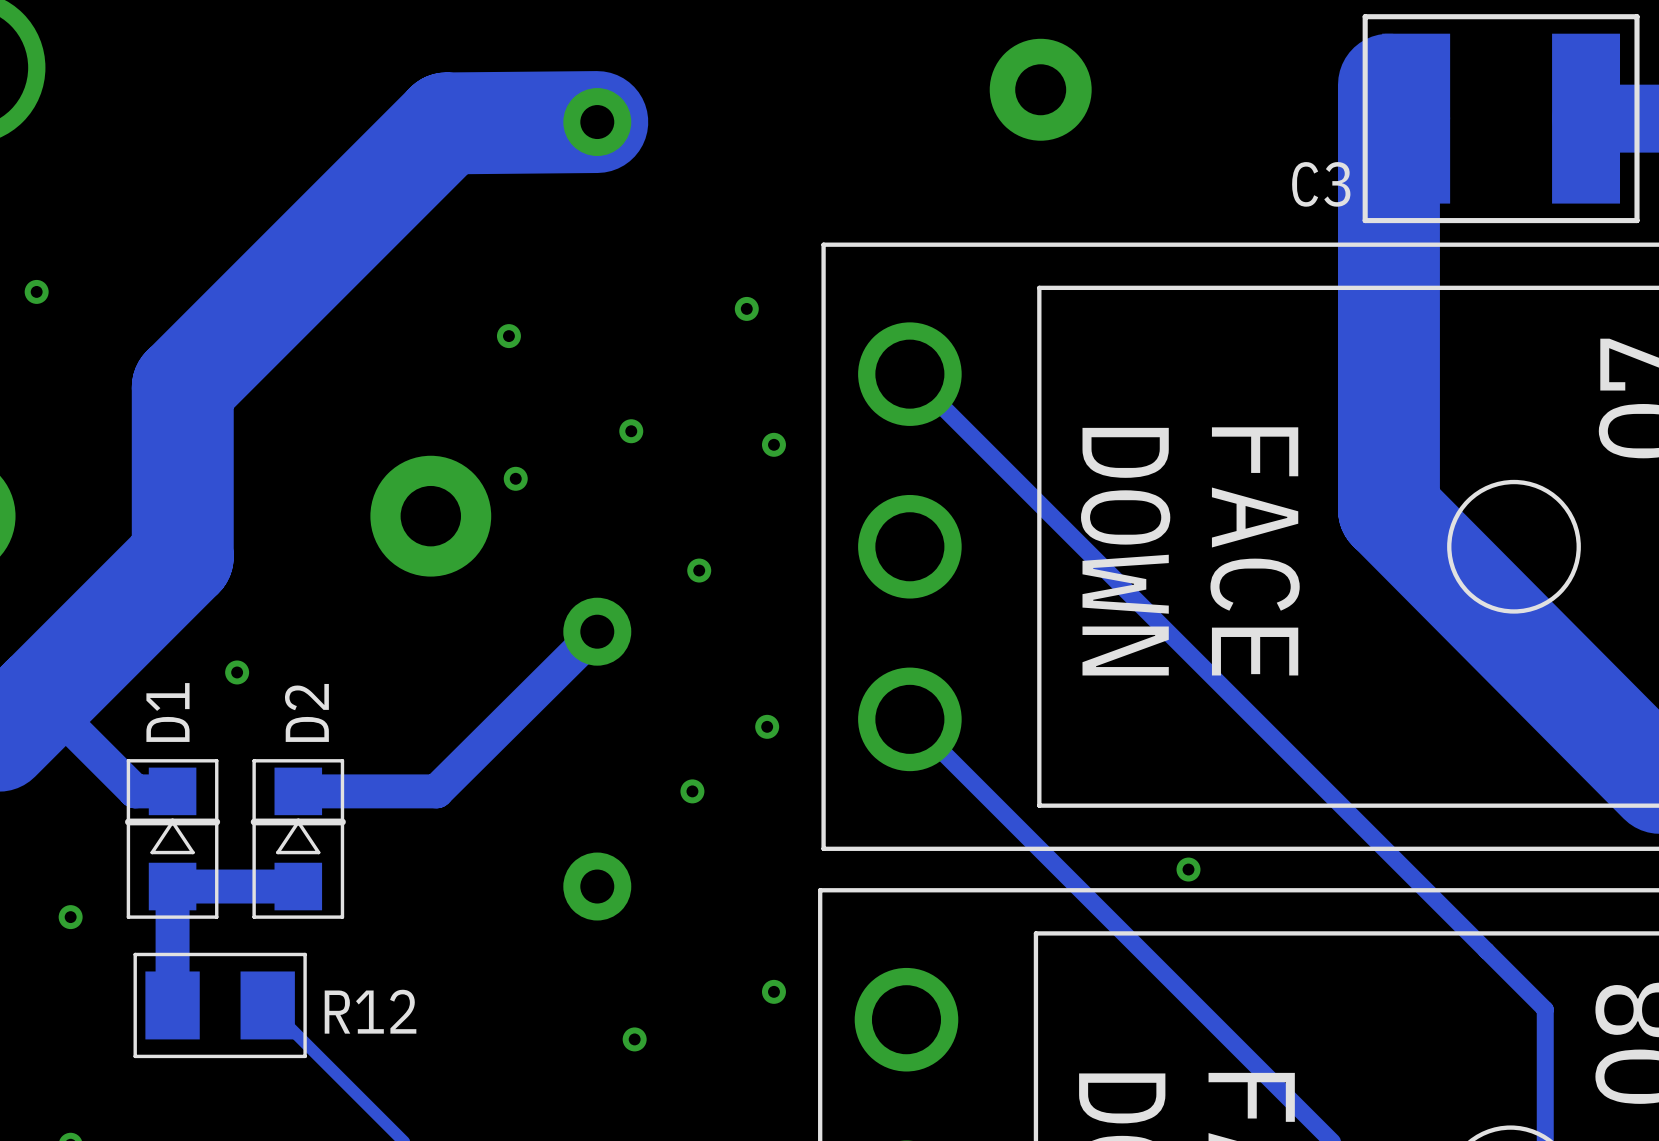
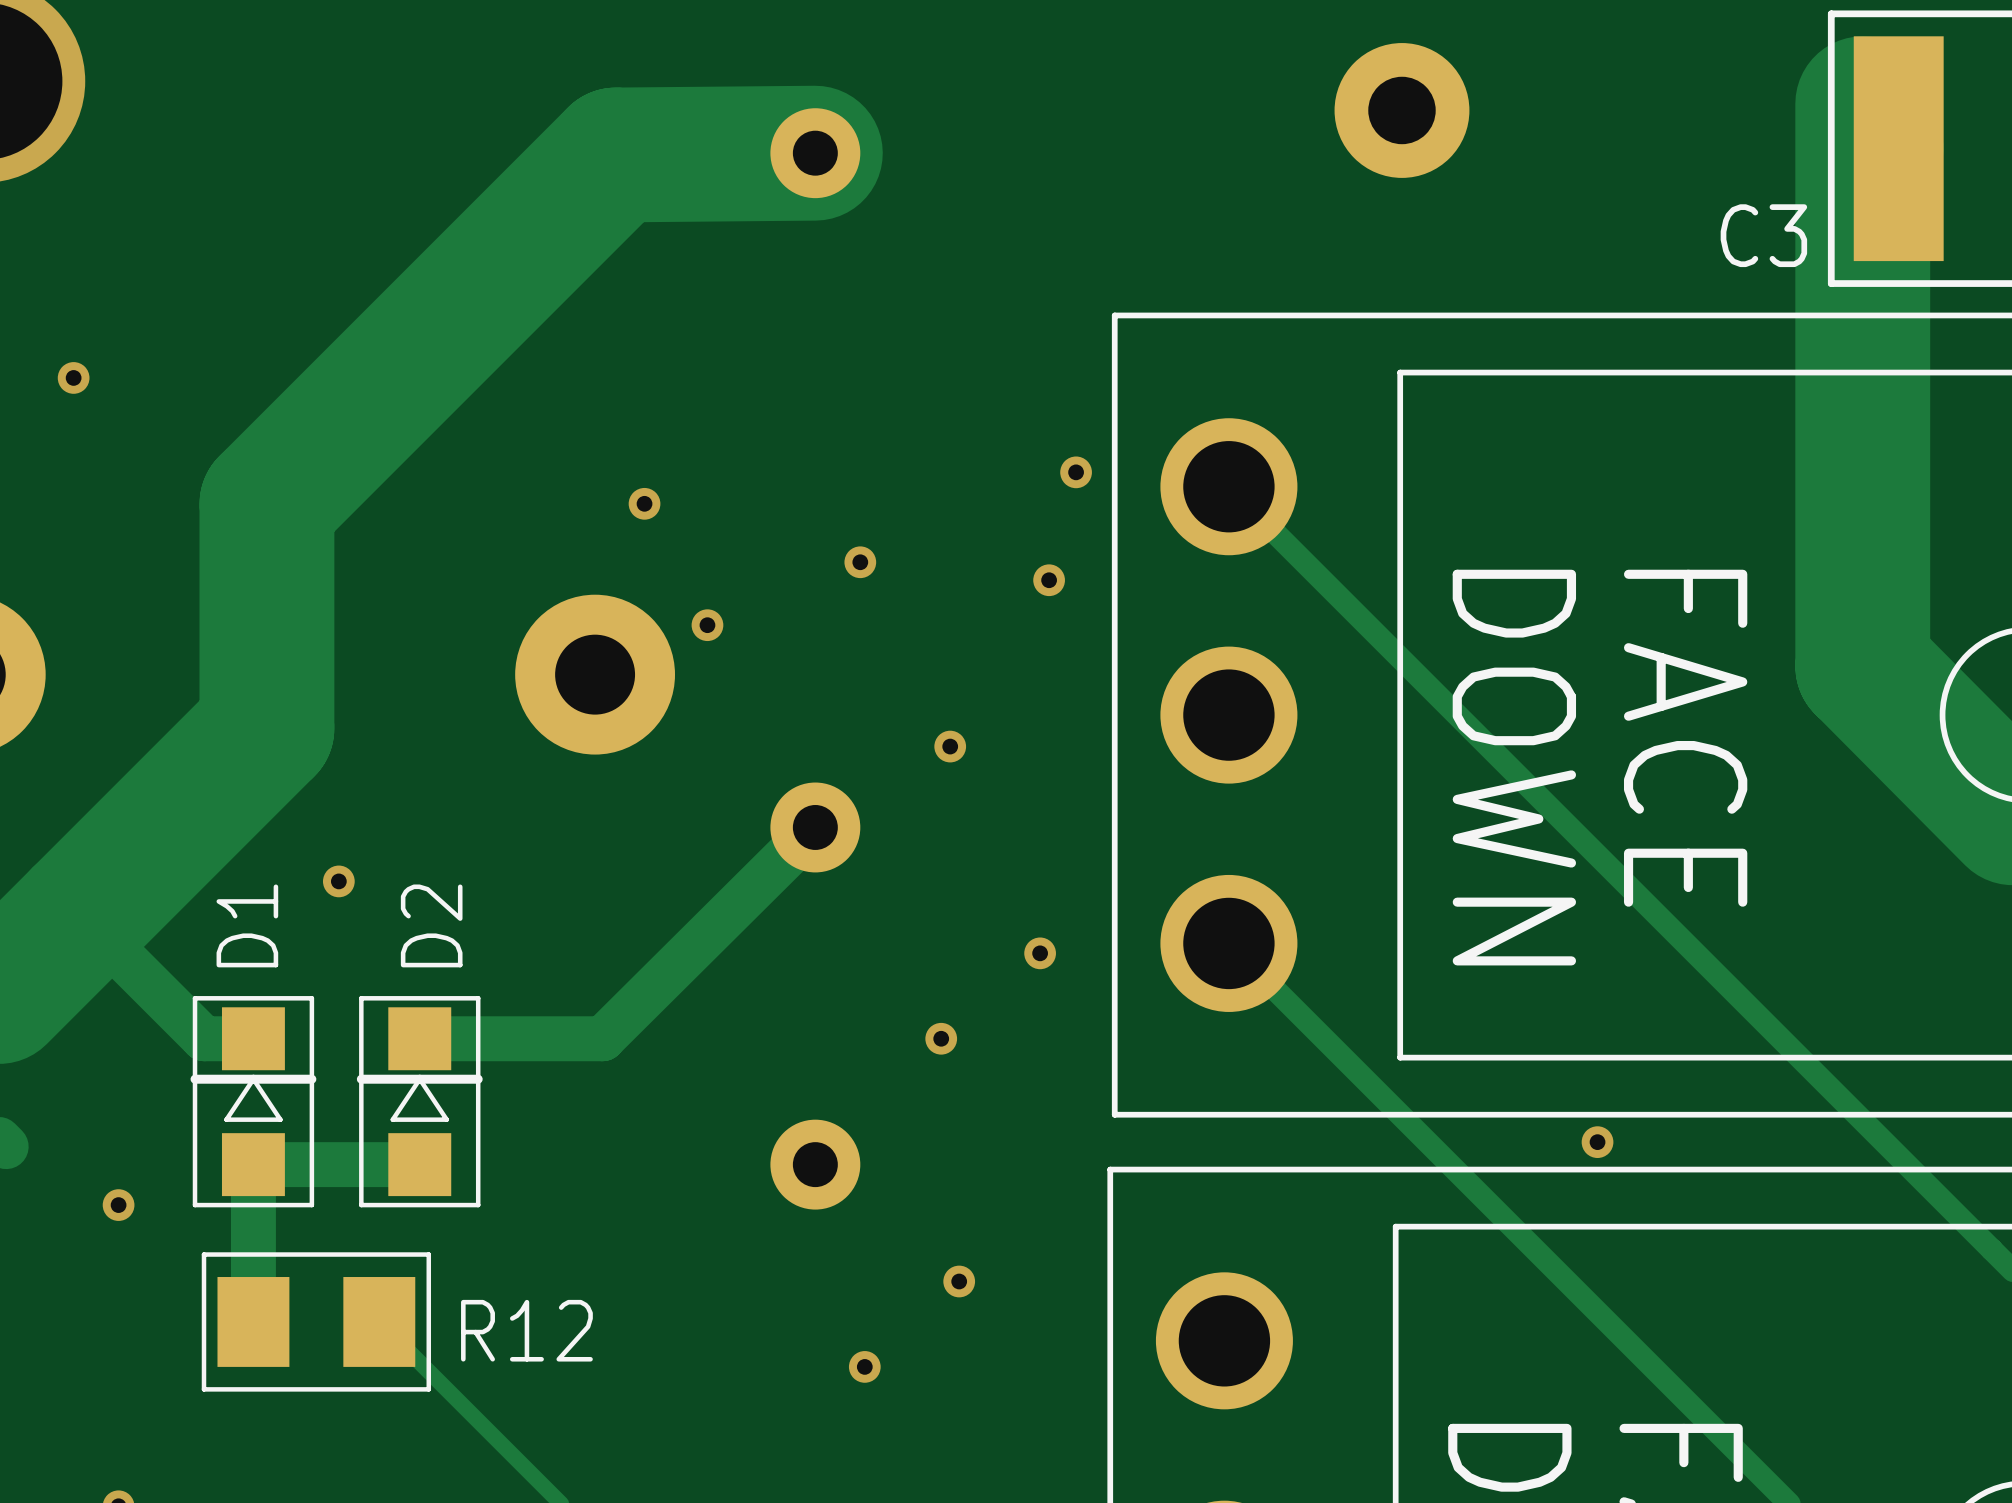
via position: (746, 308) -> (1076, 472)
via position: (508, 336) -> (644, 503)
via position: (773, 991) -> (959, 1281)

